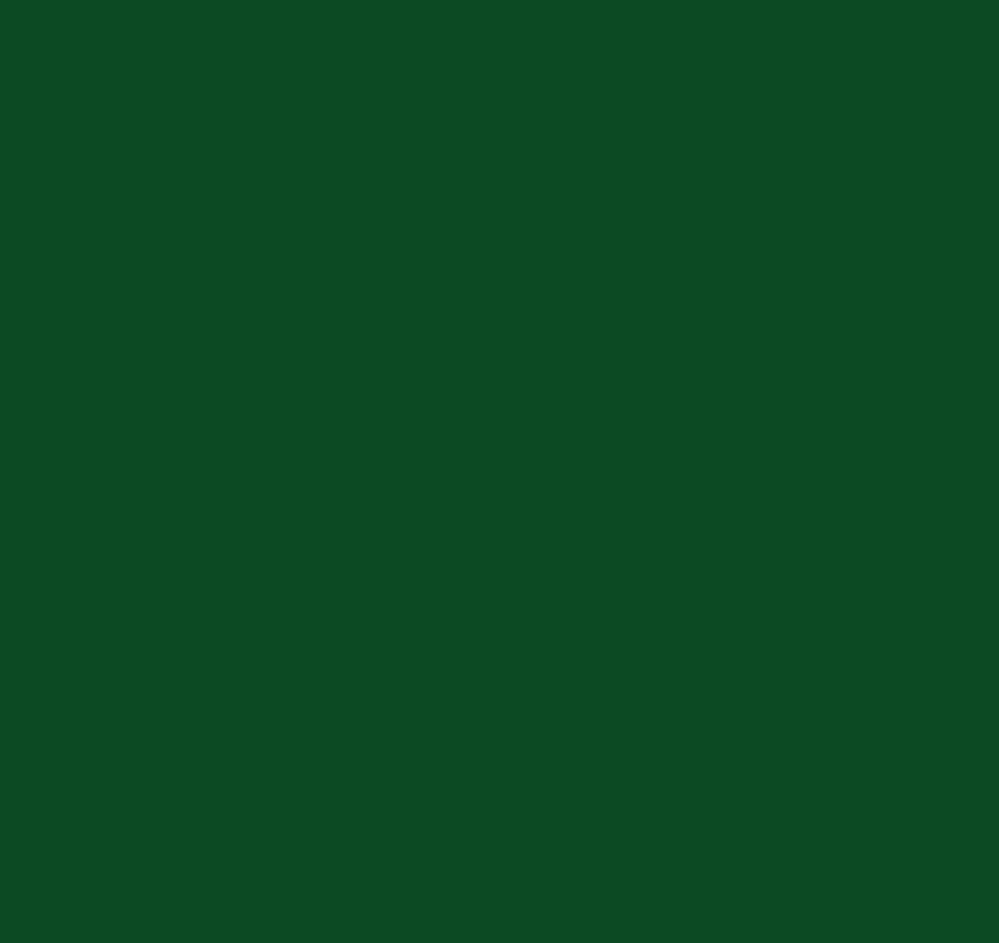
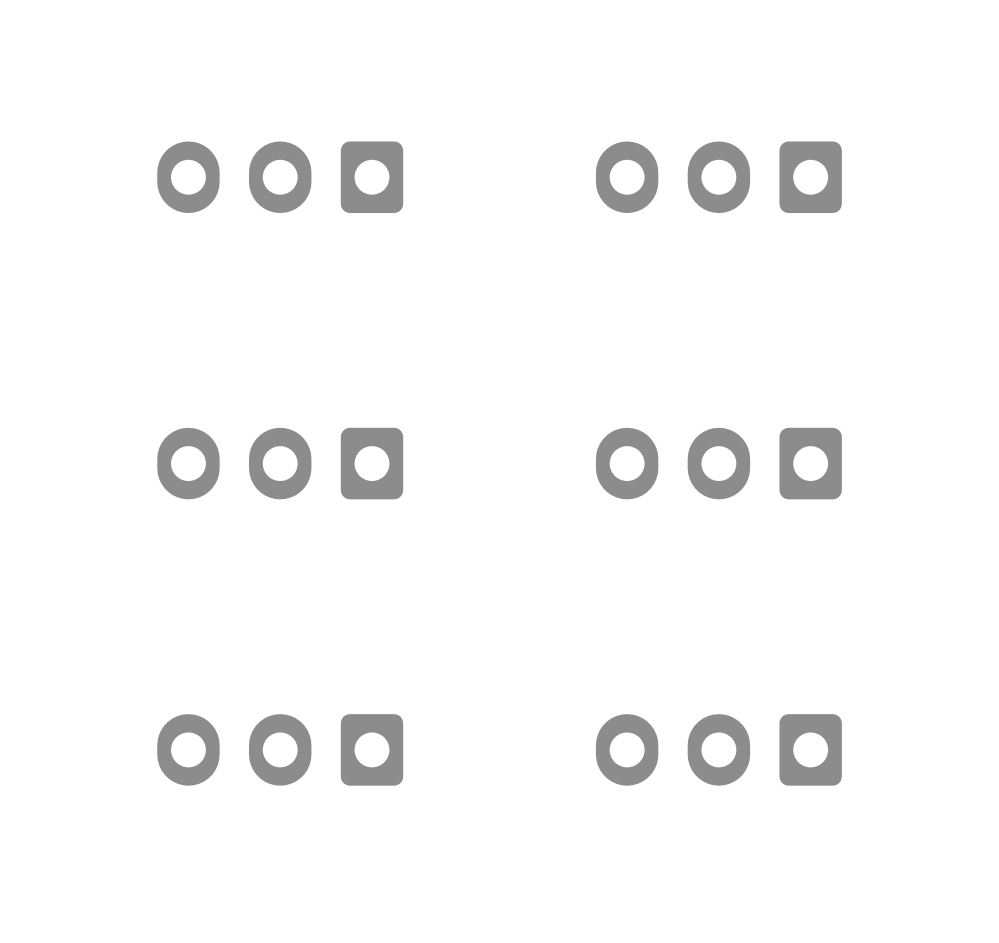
part: none -> (280, 177)
part: none -> (718, 177)
part: none -> (280, 463)
part: none -> (718, 463)
part: none -> (280, 749)
part: none -> (718, 749)

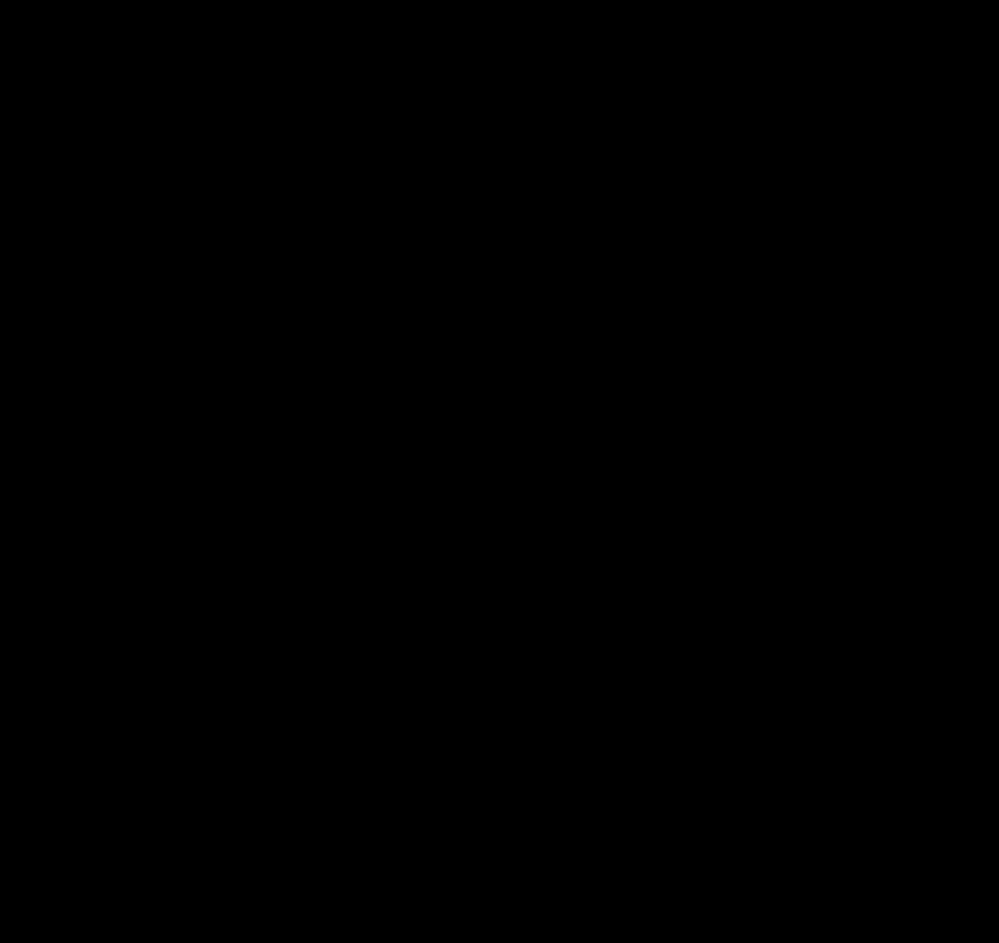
part: (280, 177) -> none
part: (718, 177) -> none
part: (280, 463) -> none
part: (718, 463) -> none
part: (280, 749) -> none
part: (718, 749) -> none

